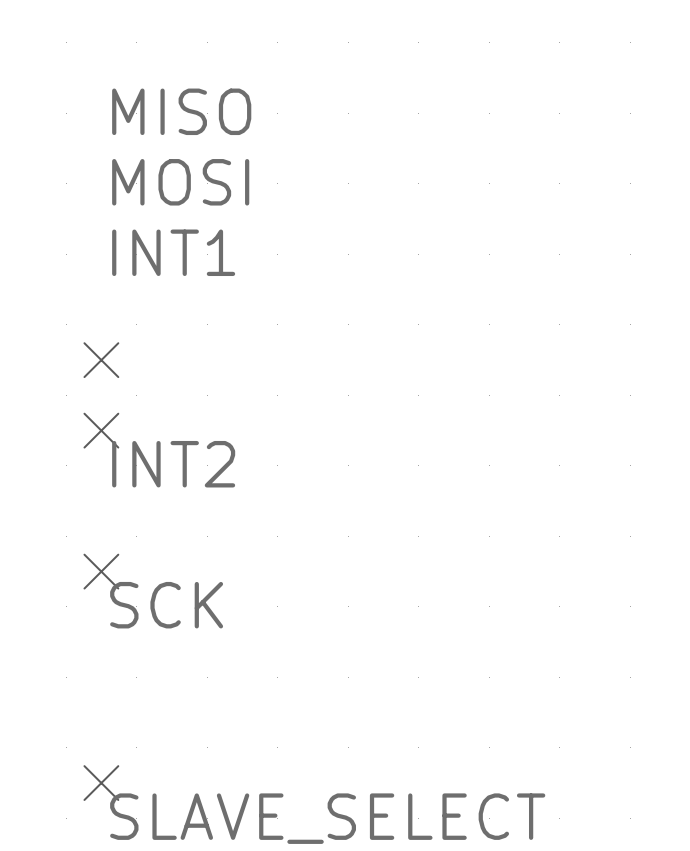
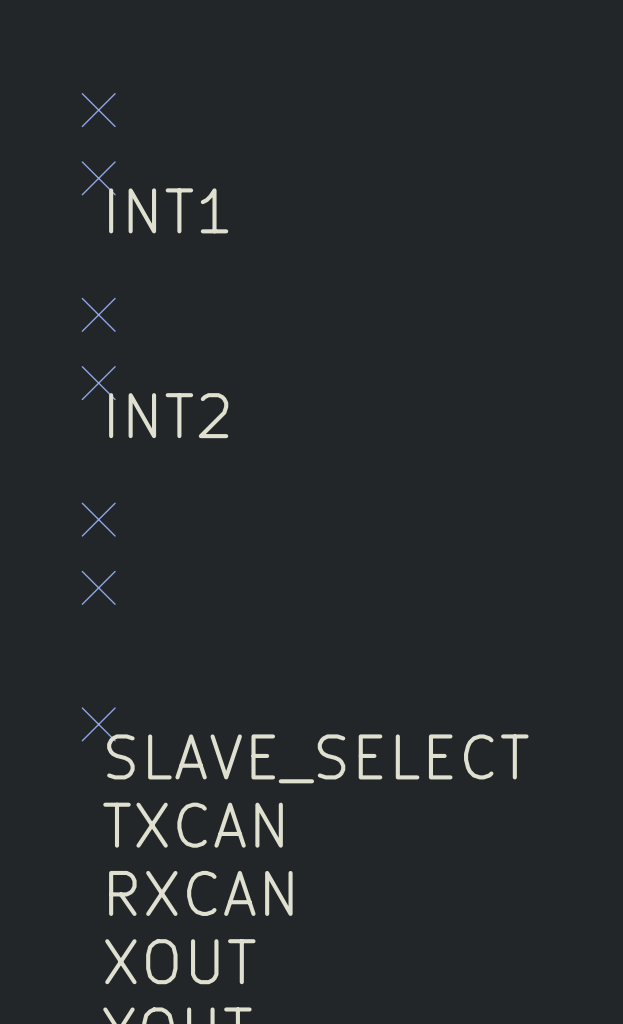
label: MISO (181, 111) -> none
no-connect mark: none -> (98, 110)
label: MOSI (180, 182) -> none
no-connect mark: none -> (98, 178)
label: SCK (166, 605) -> none
no-connect mark: none -> (98, 587)

